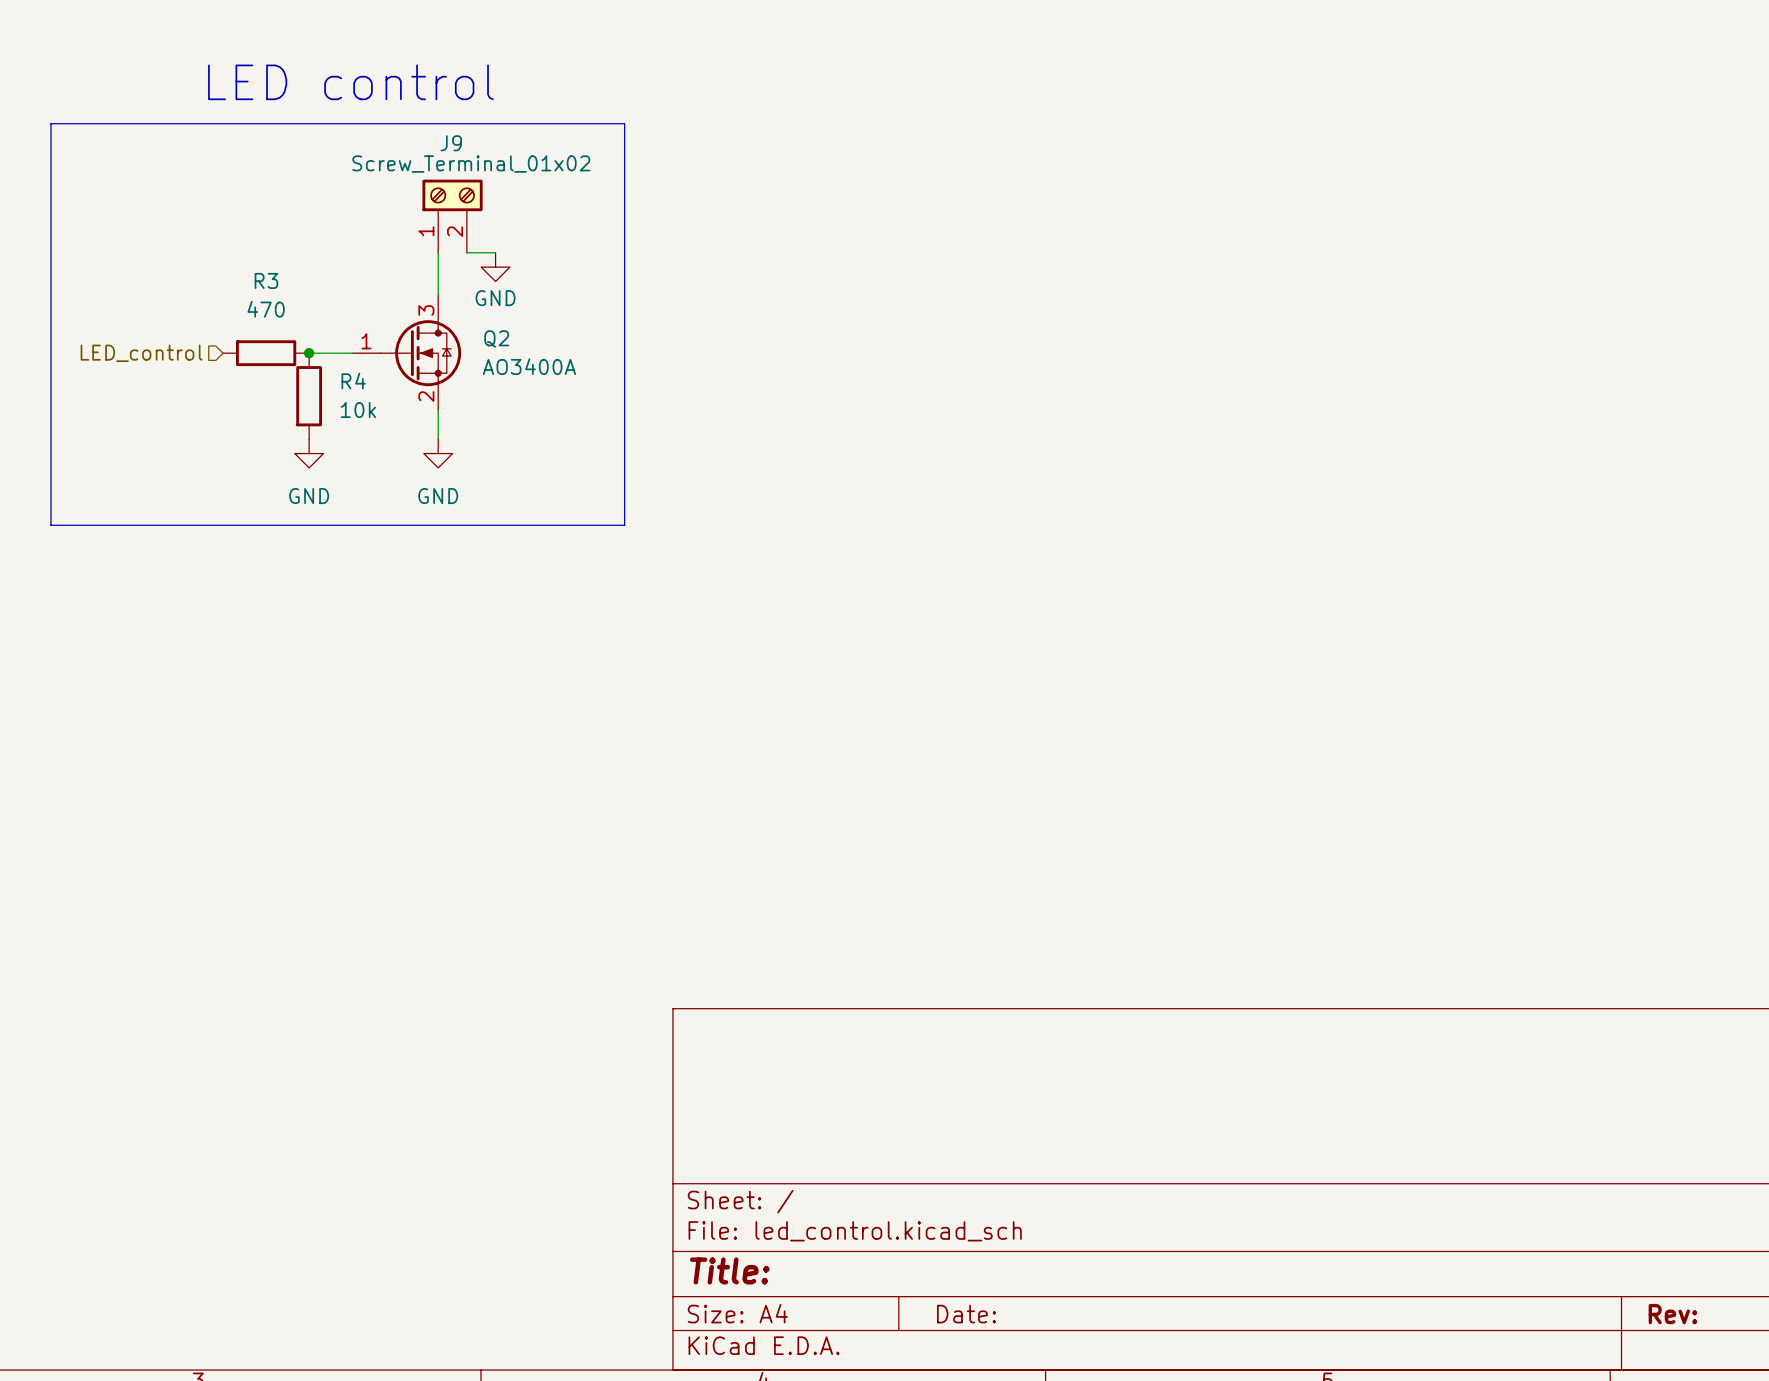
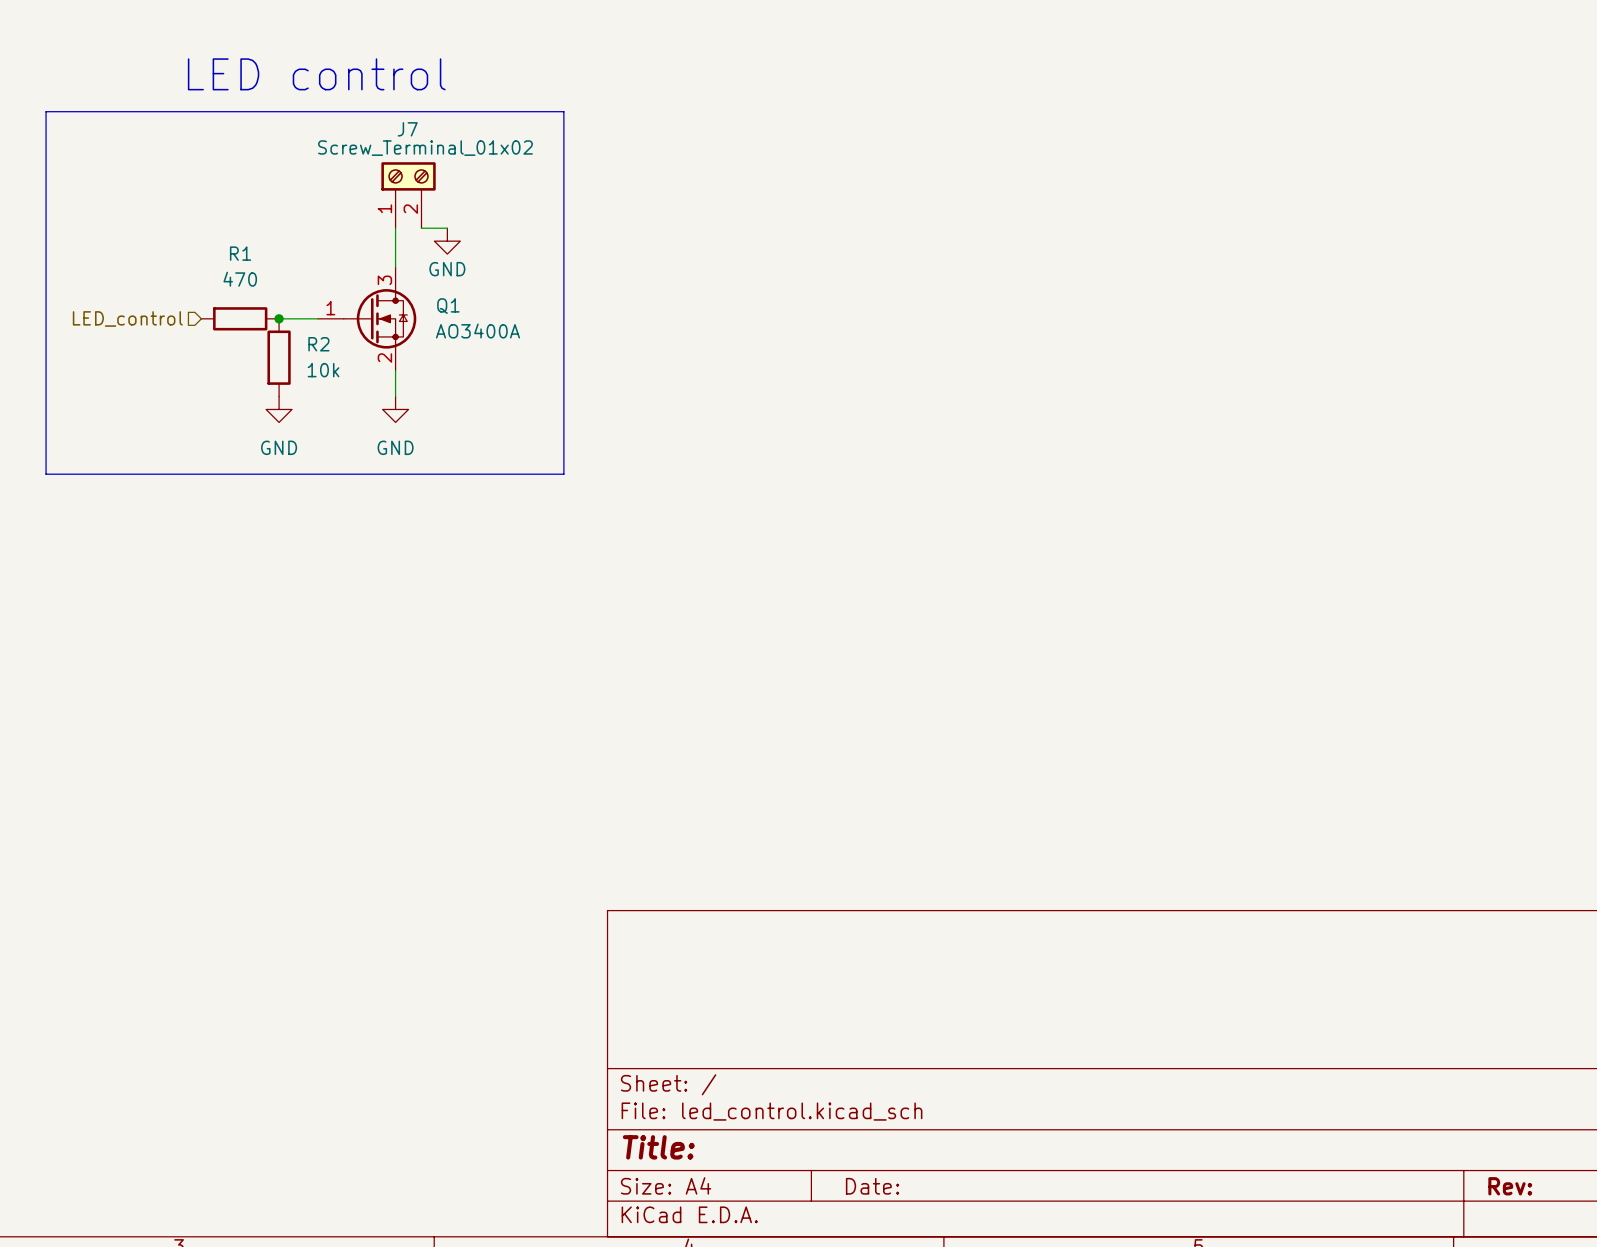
J9 name: J9 (451, 143) -> J7 (407, 129)
R3 name: R3 (266, 280) -> R1 (240, 253)
Q2 name: Q2 (496, 338) -> Q1 (448, 306)
R4 name: R4 (353, 380) -> R2 (318, 344)

